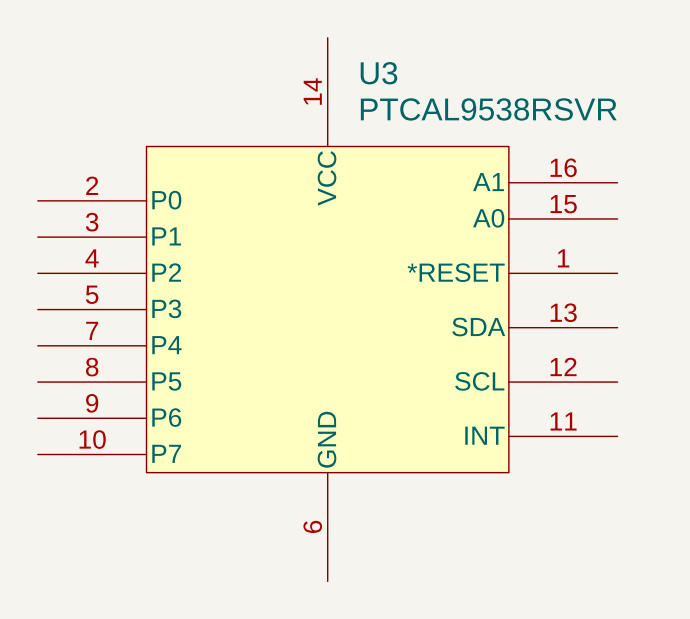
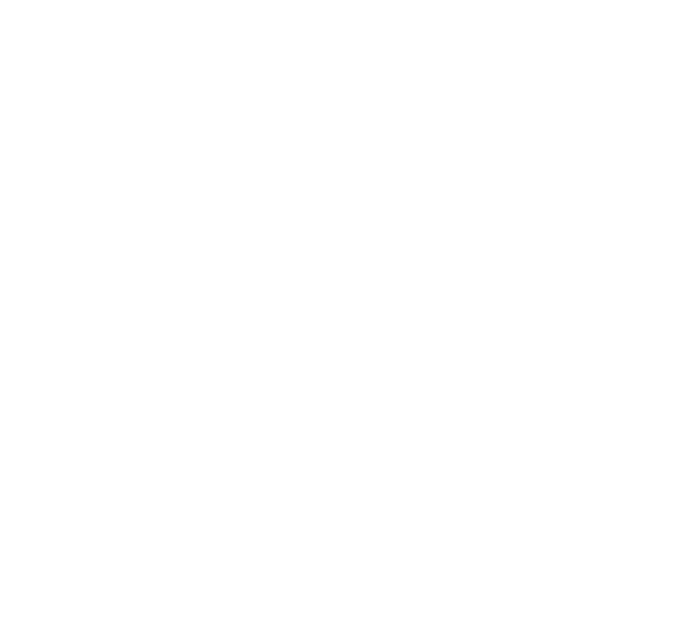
U3: PTCAL9538RSVR (327, 309) -> none

